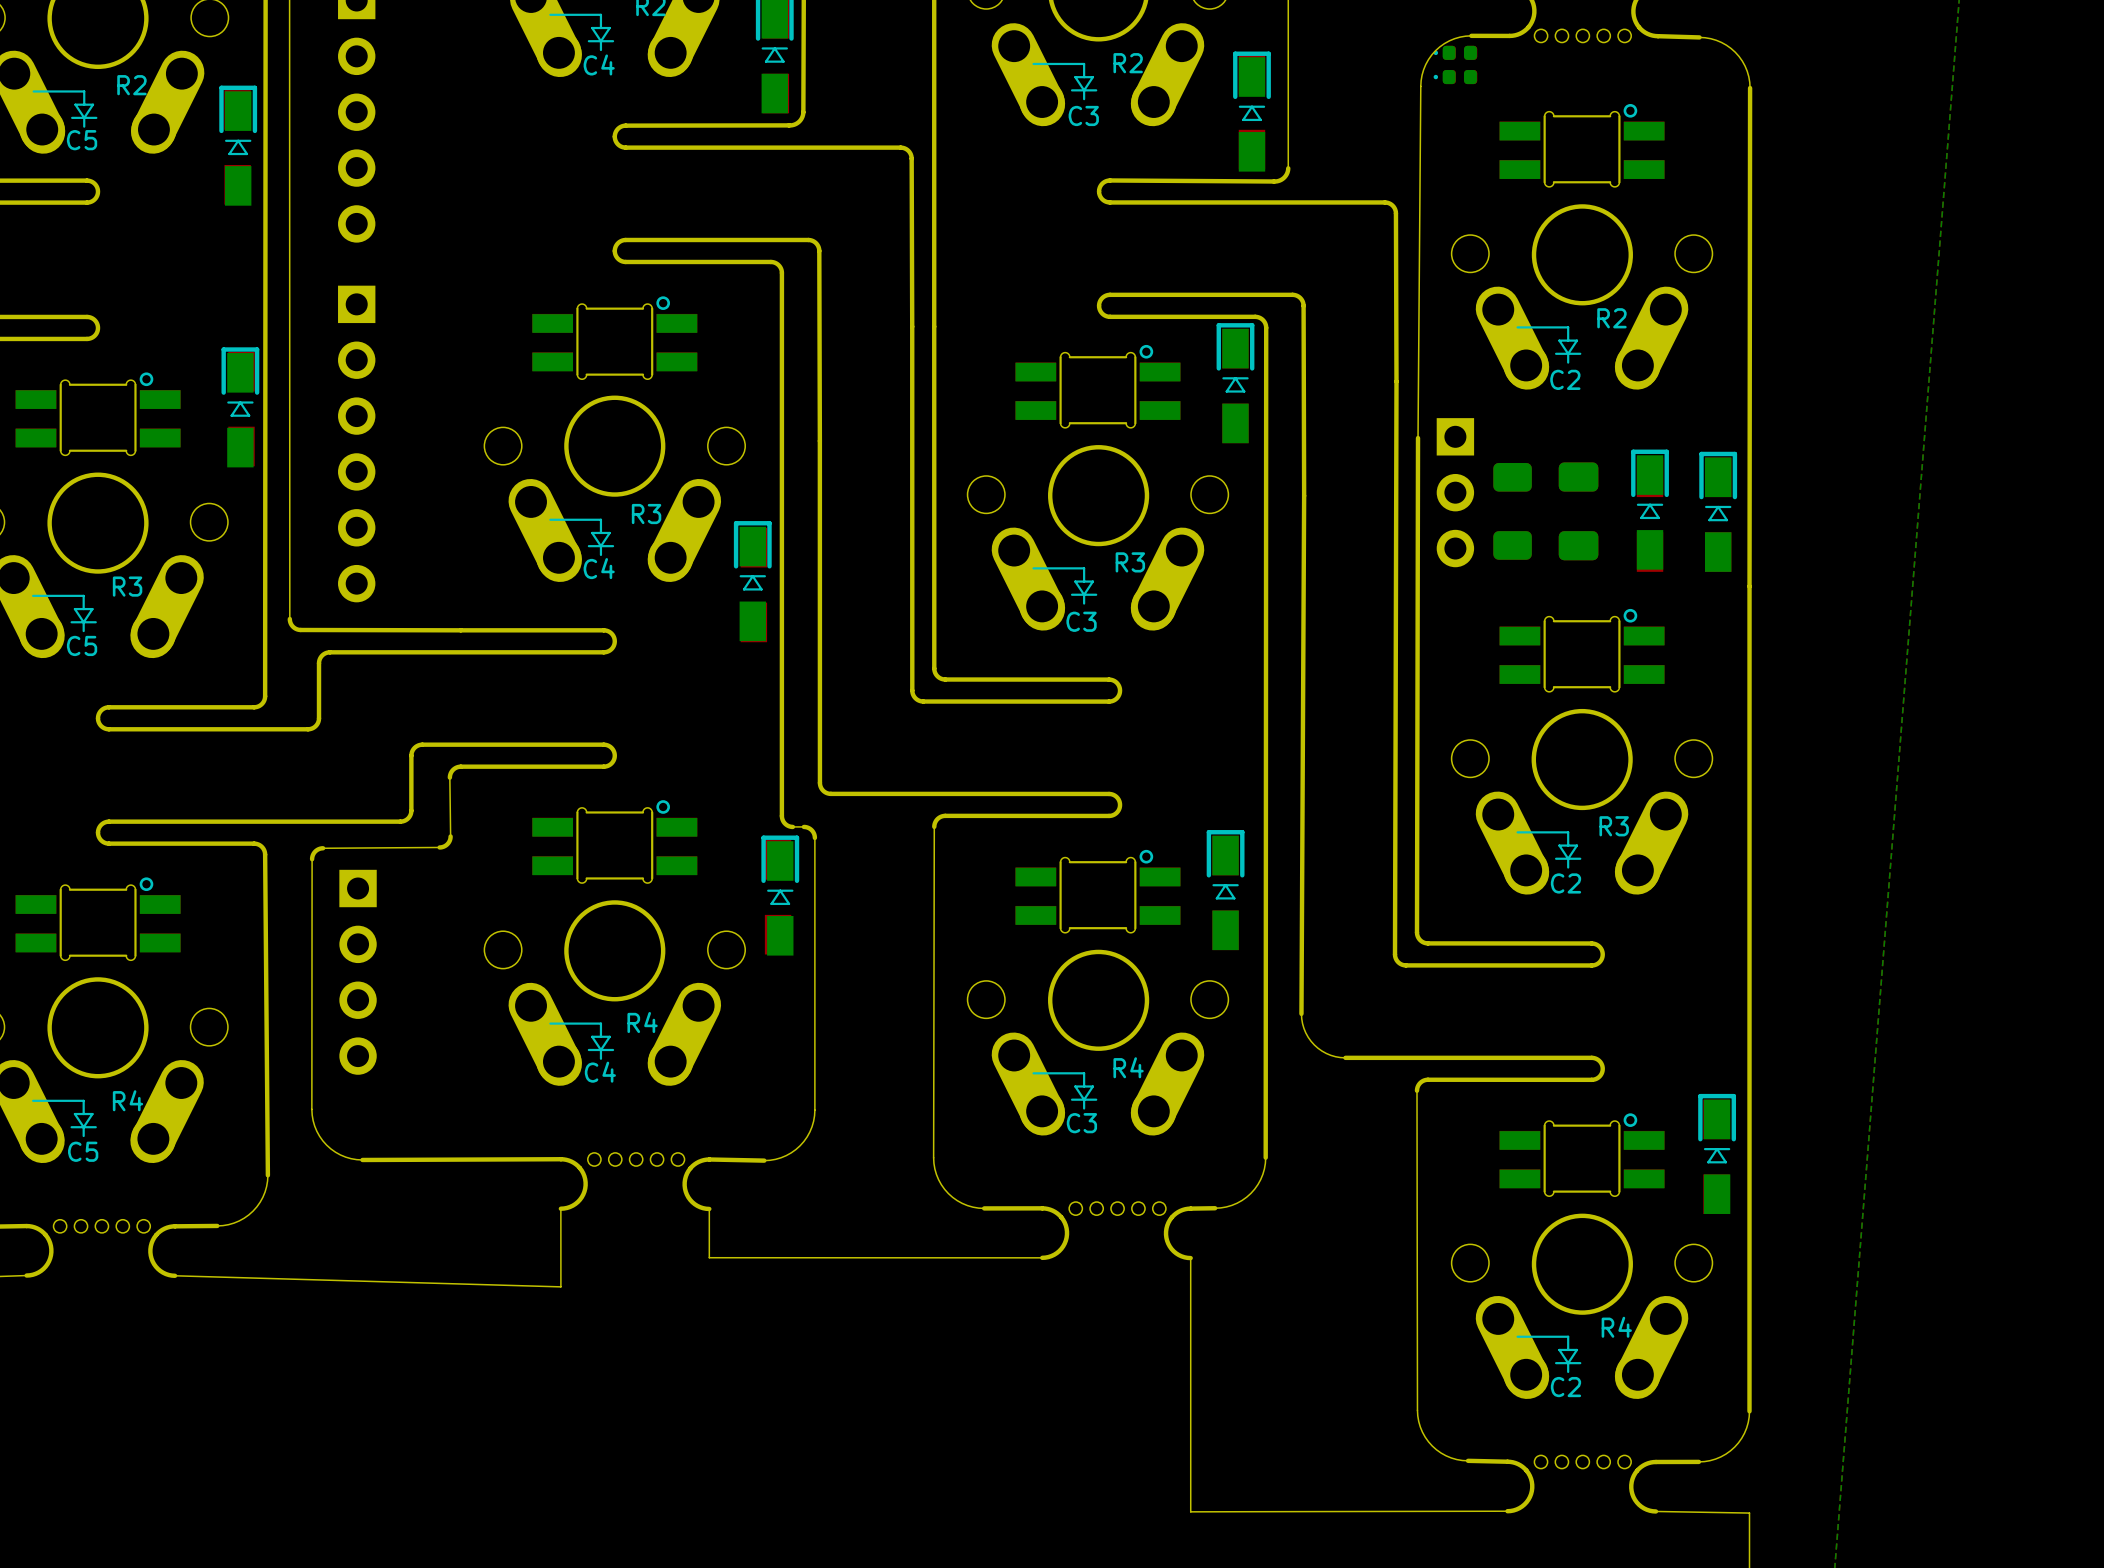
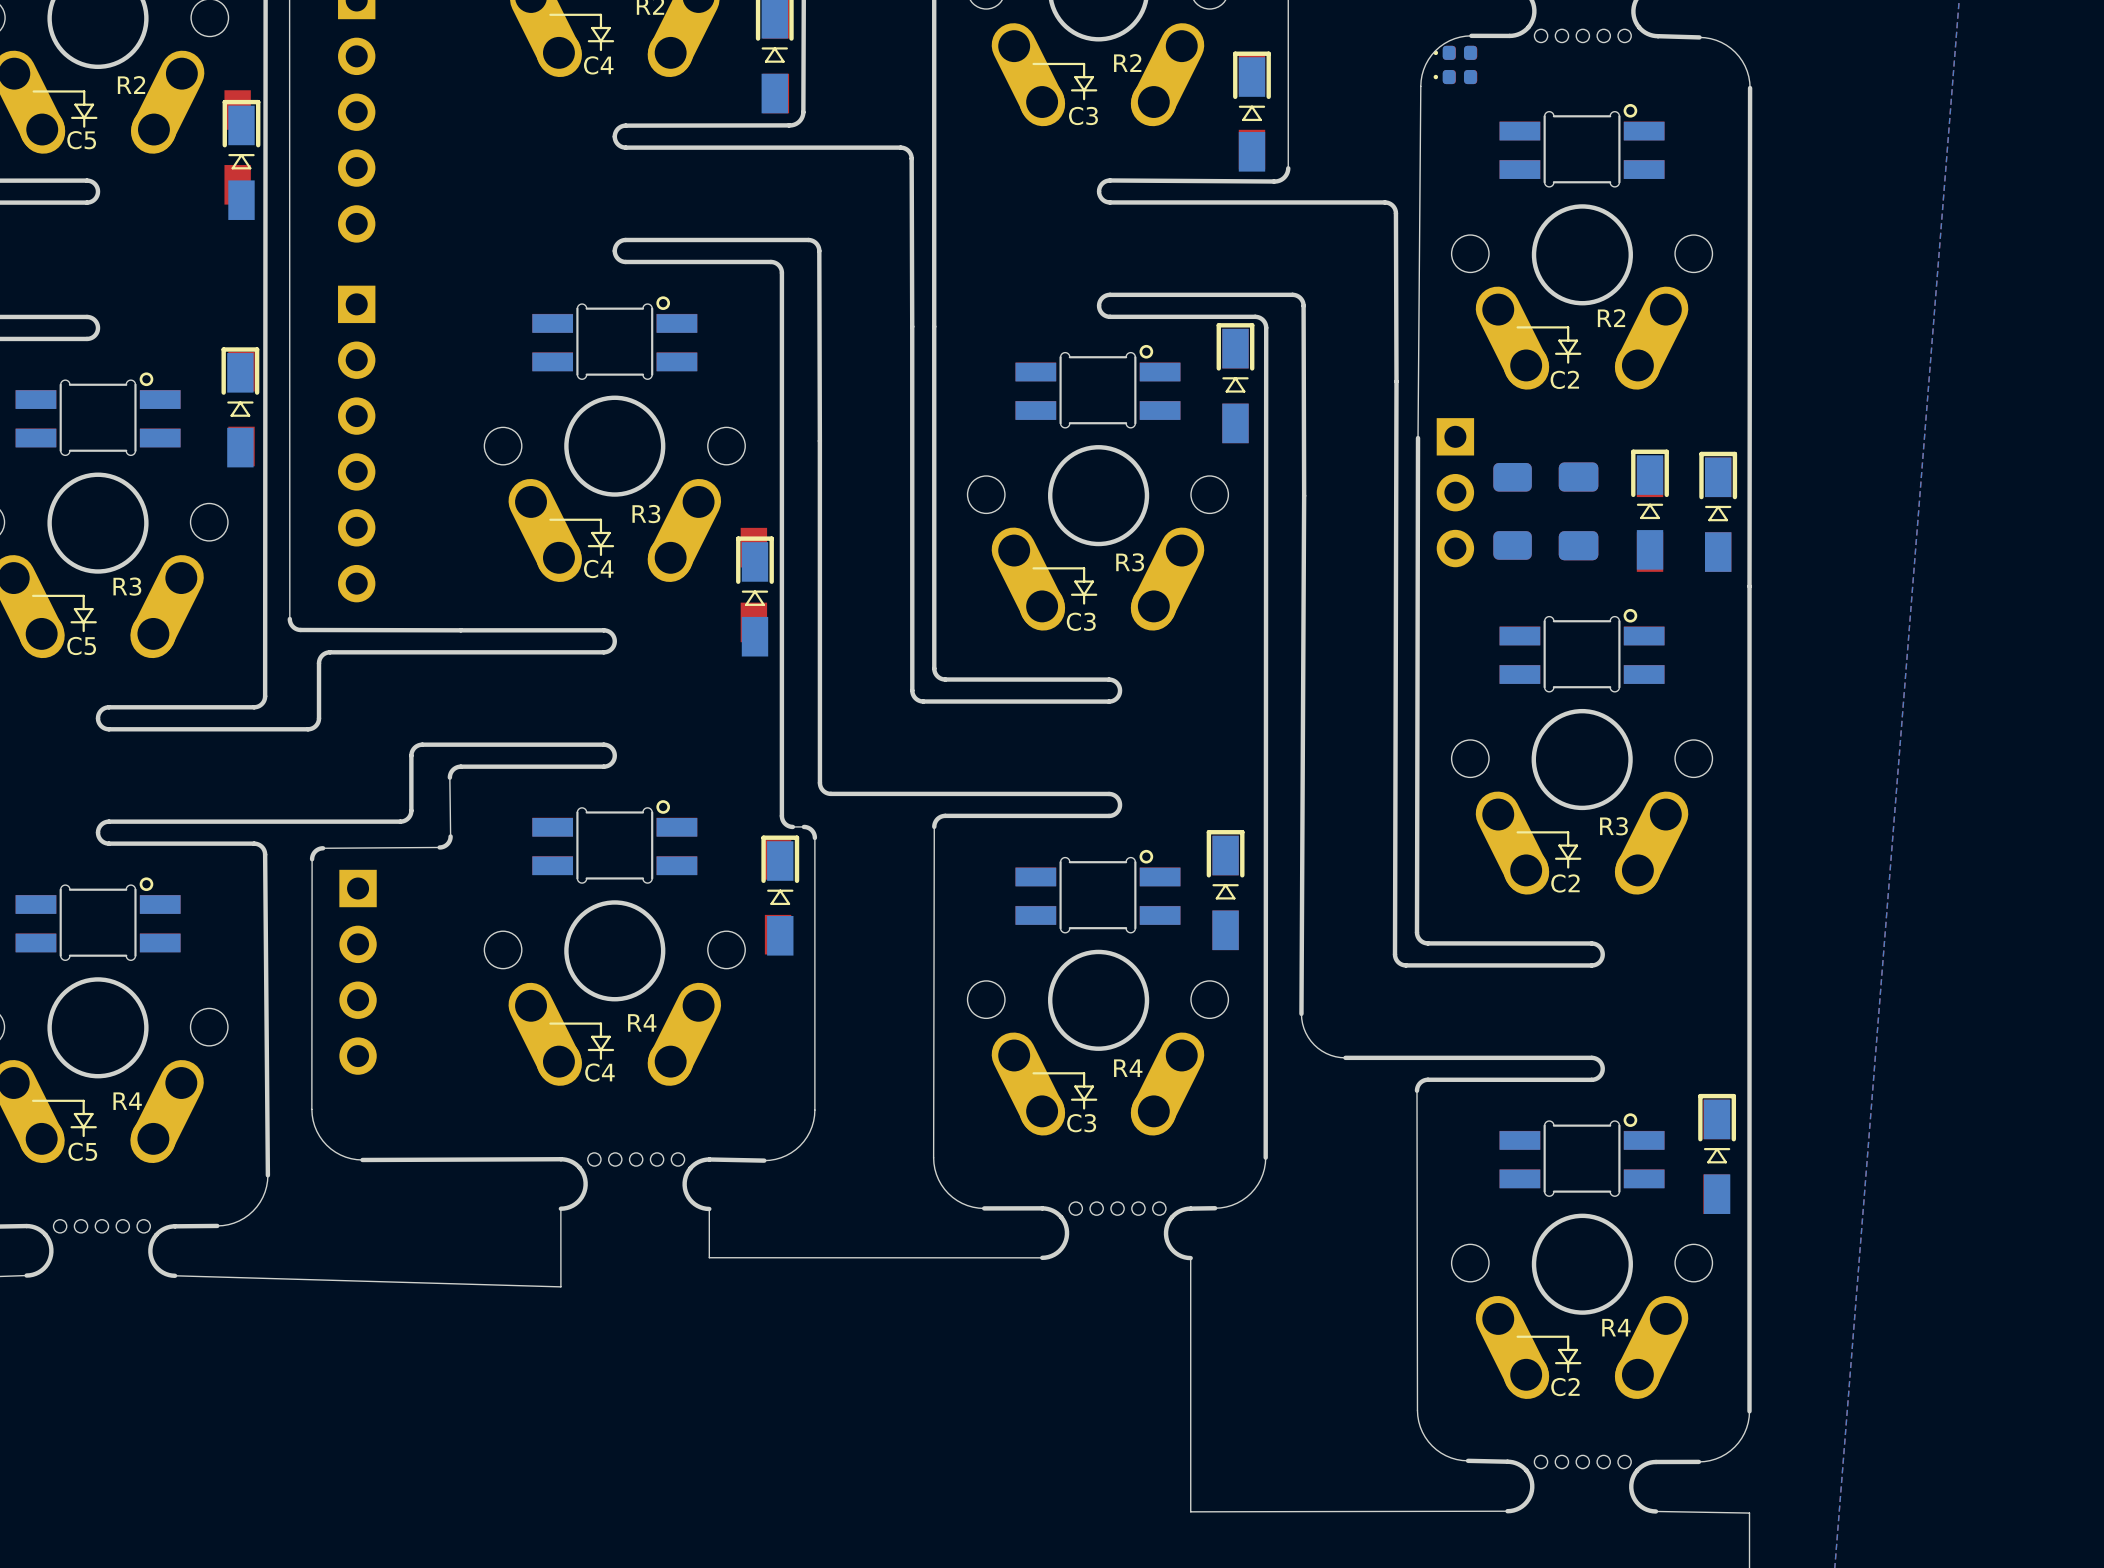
part position: (238, 145) -> (241, 159)
part position: (752, 581) -> (754, 596)

